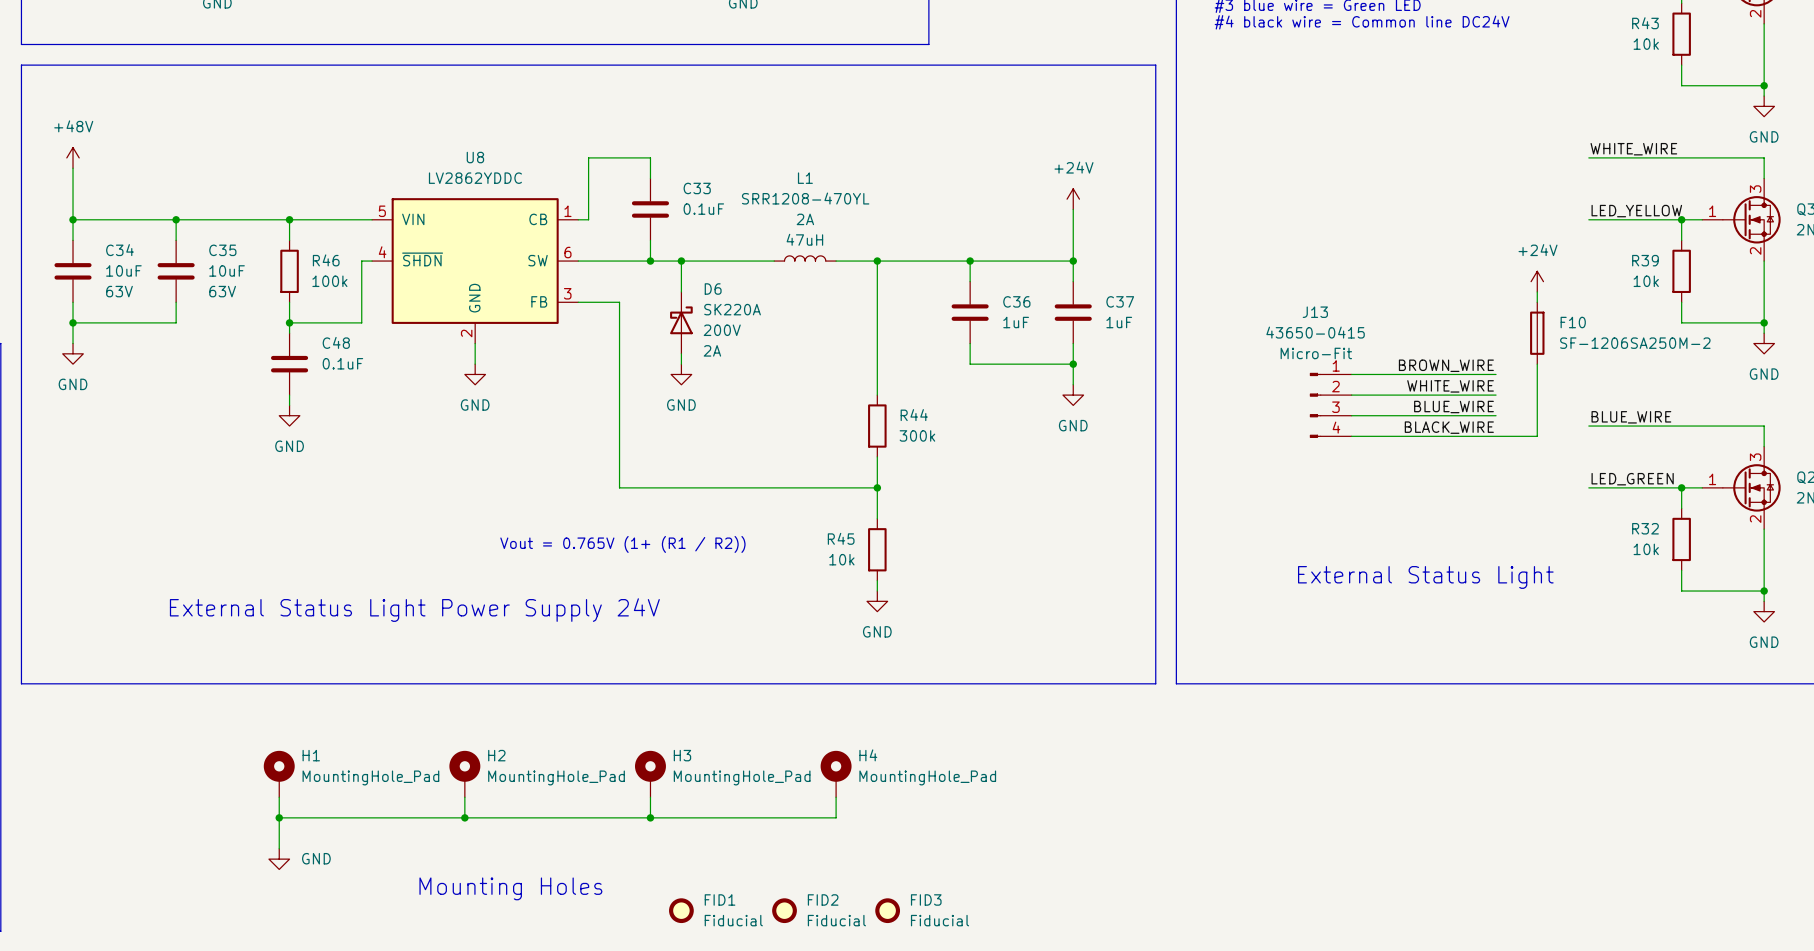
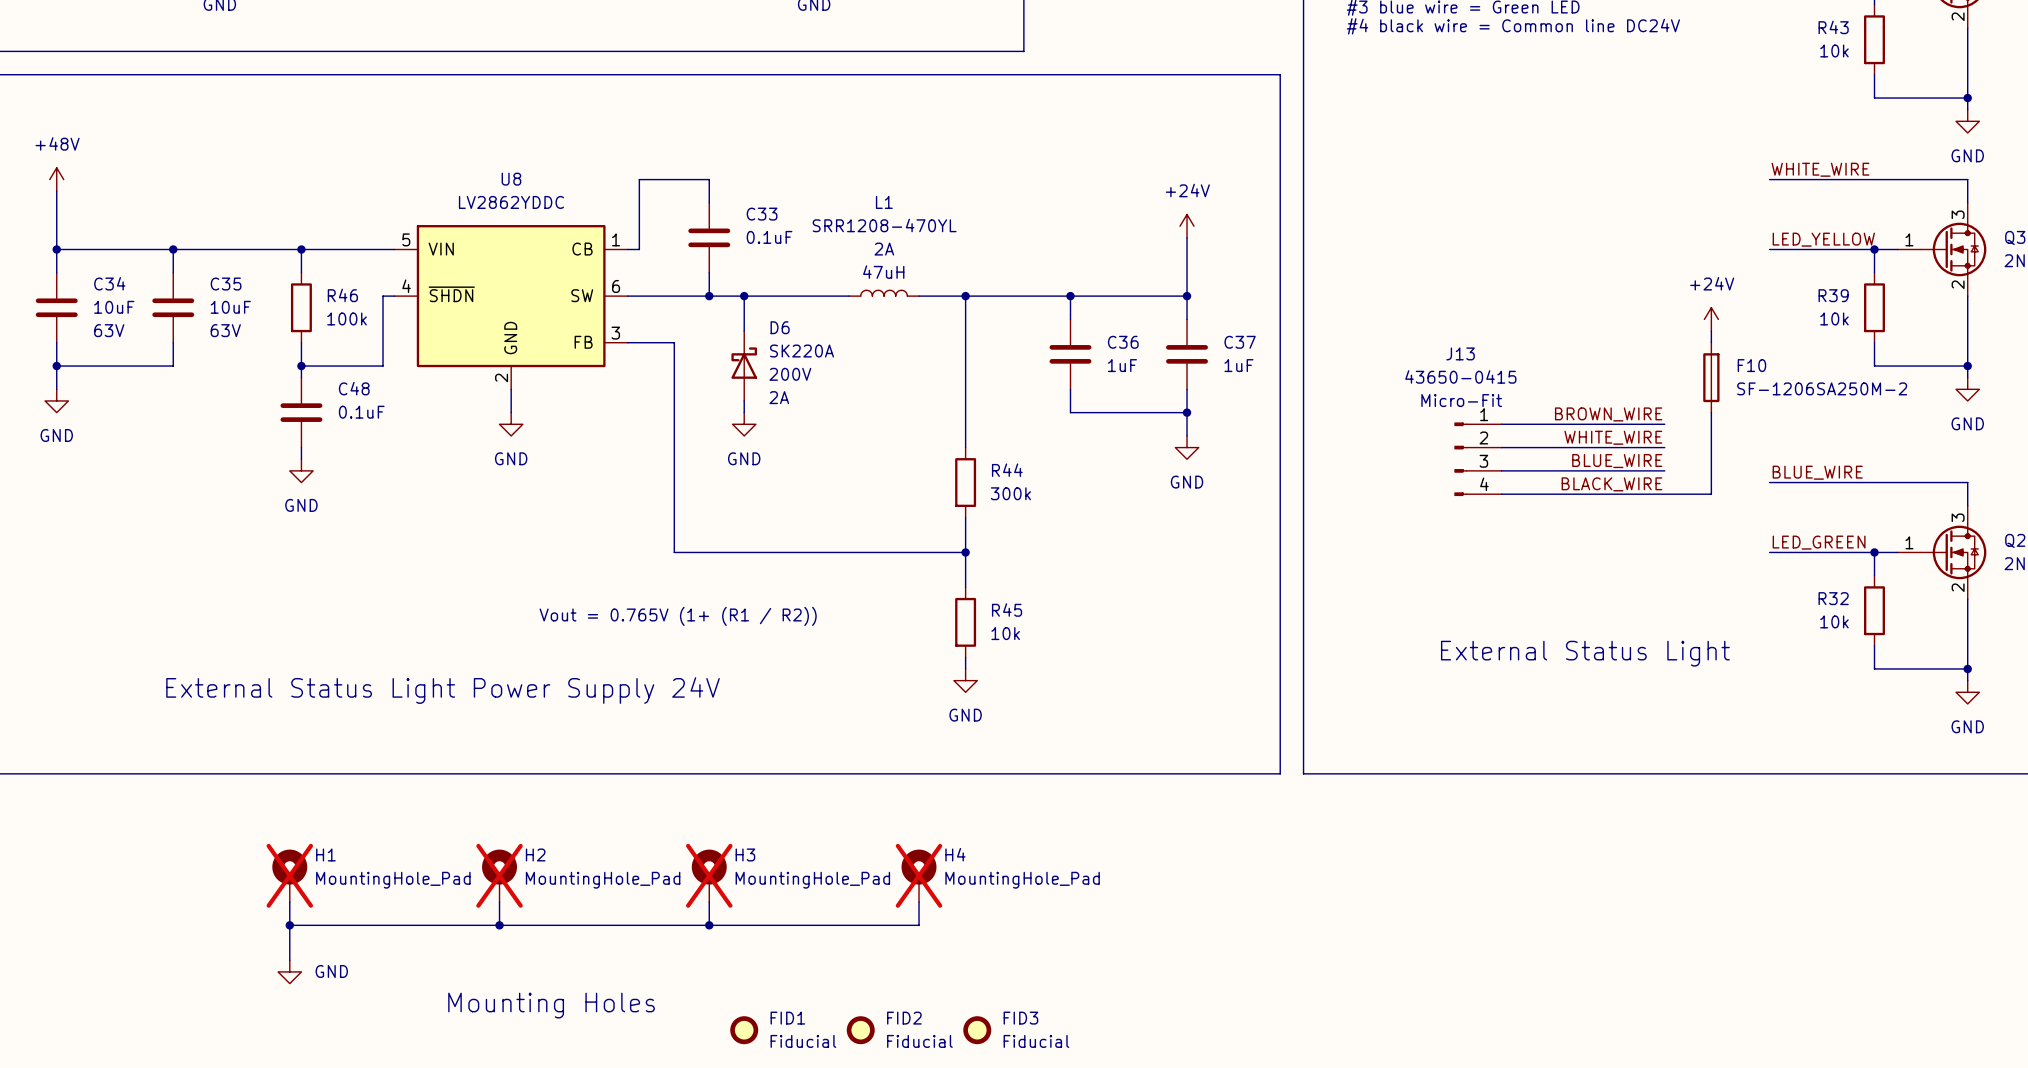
R45 name position: R45 (841, 538) -> R45 (1007, 610)
R45 value position: 10k (841, 559) -> 10k (1005, 633)
H1 do-not-place cross: none -> (289, 875)
H2 do-not-place cross: none -> (499, 875)
H3 do-not-place cross: none -> (709, 875)
H4 do-not-place cross: none -> (919, 875)

